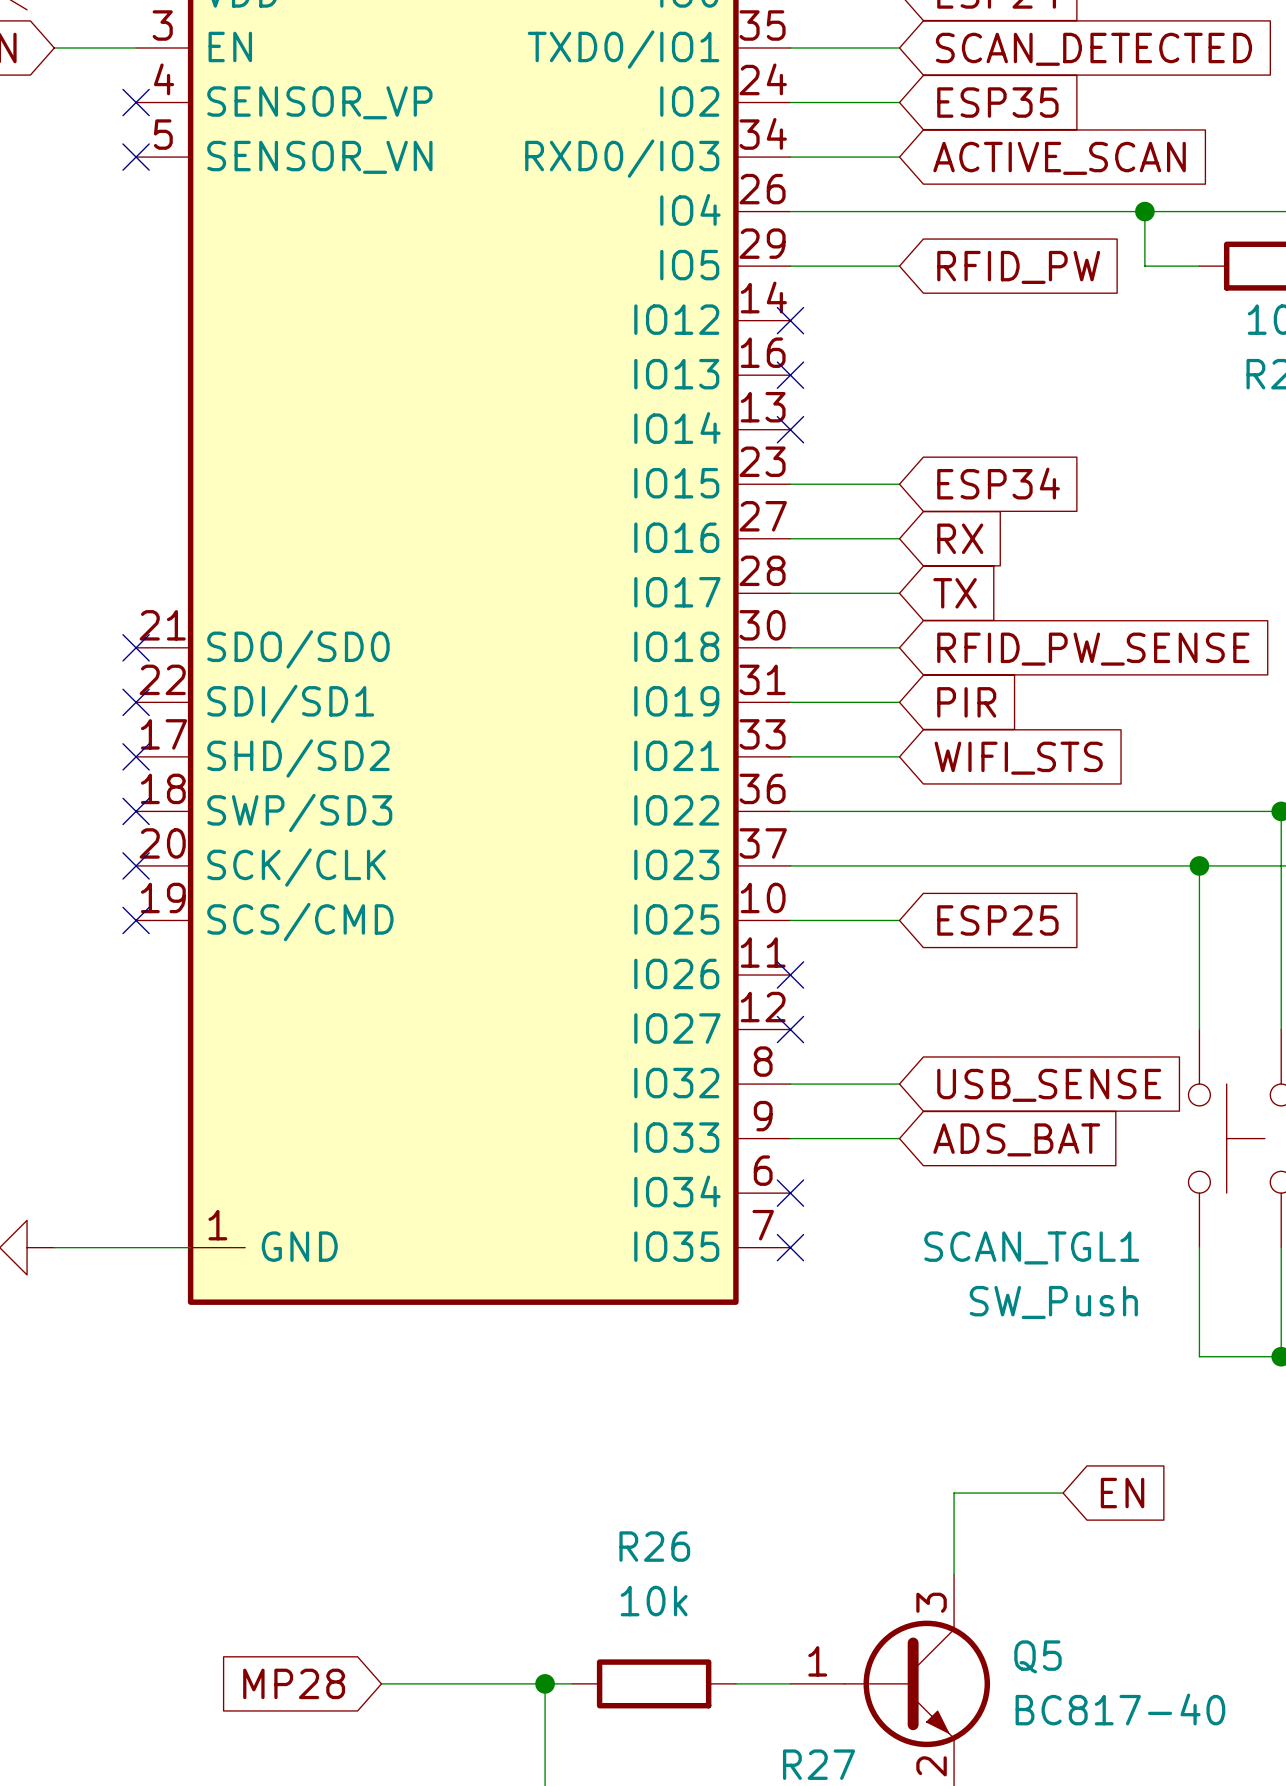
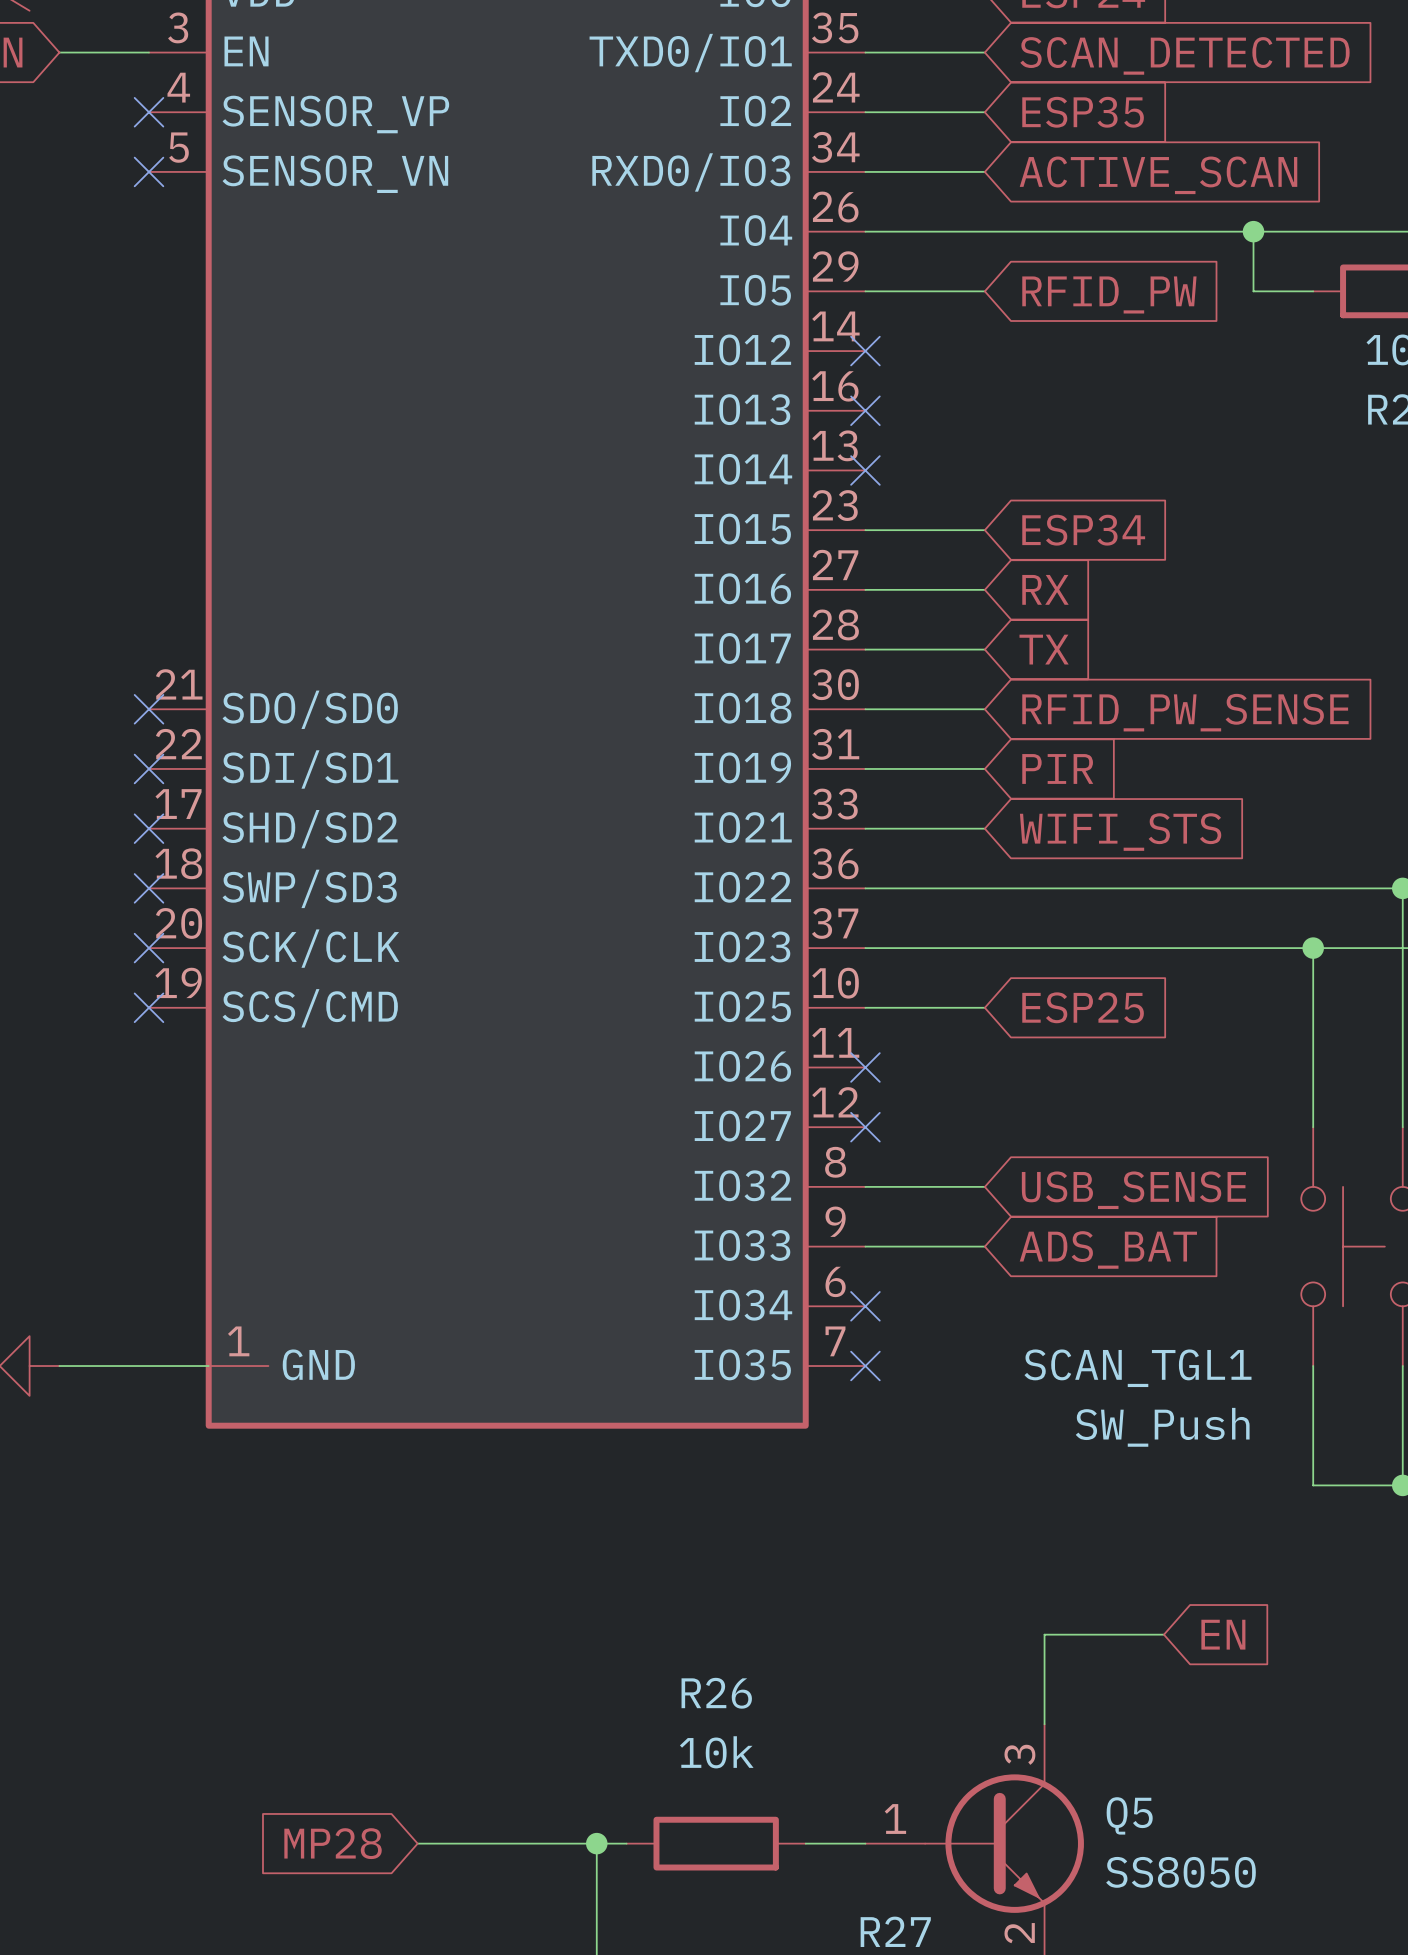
Q5 value: BC817-40 (1120, 1709) -> SS8050 (1180, 1872)

